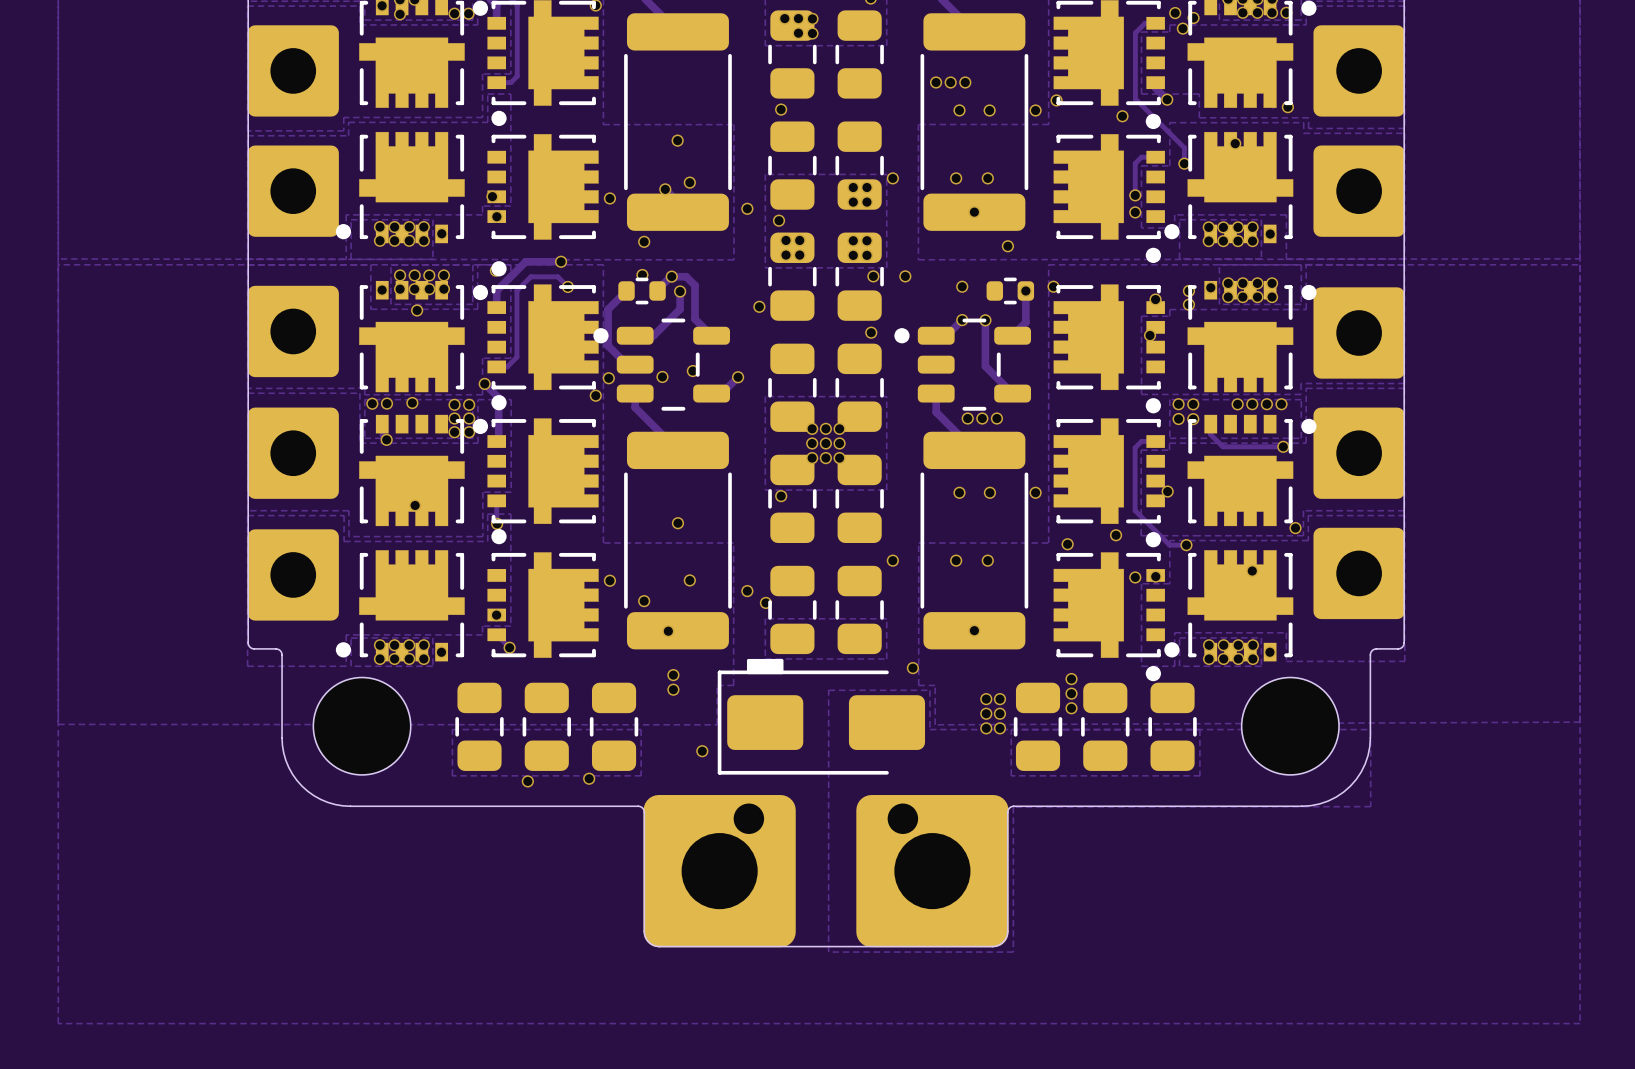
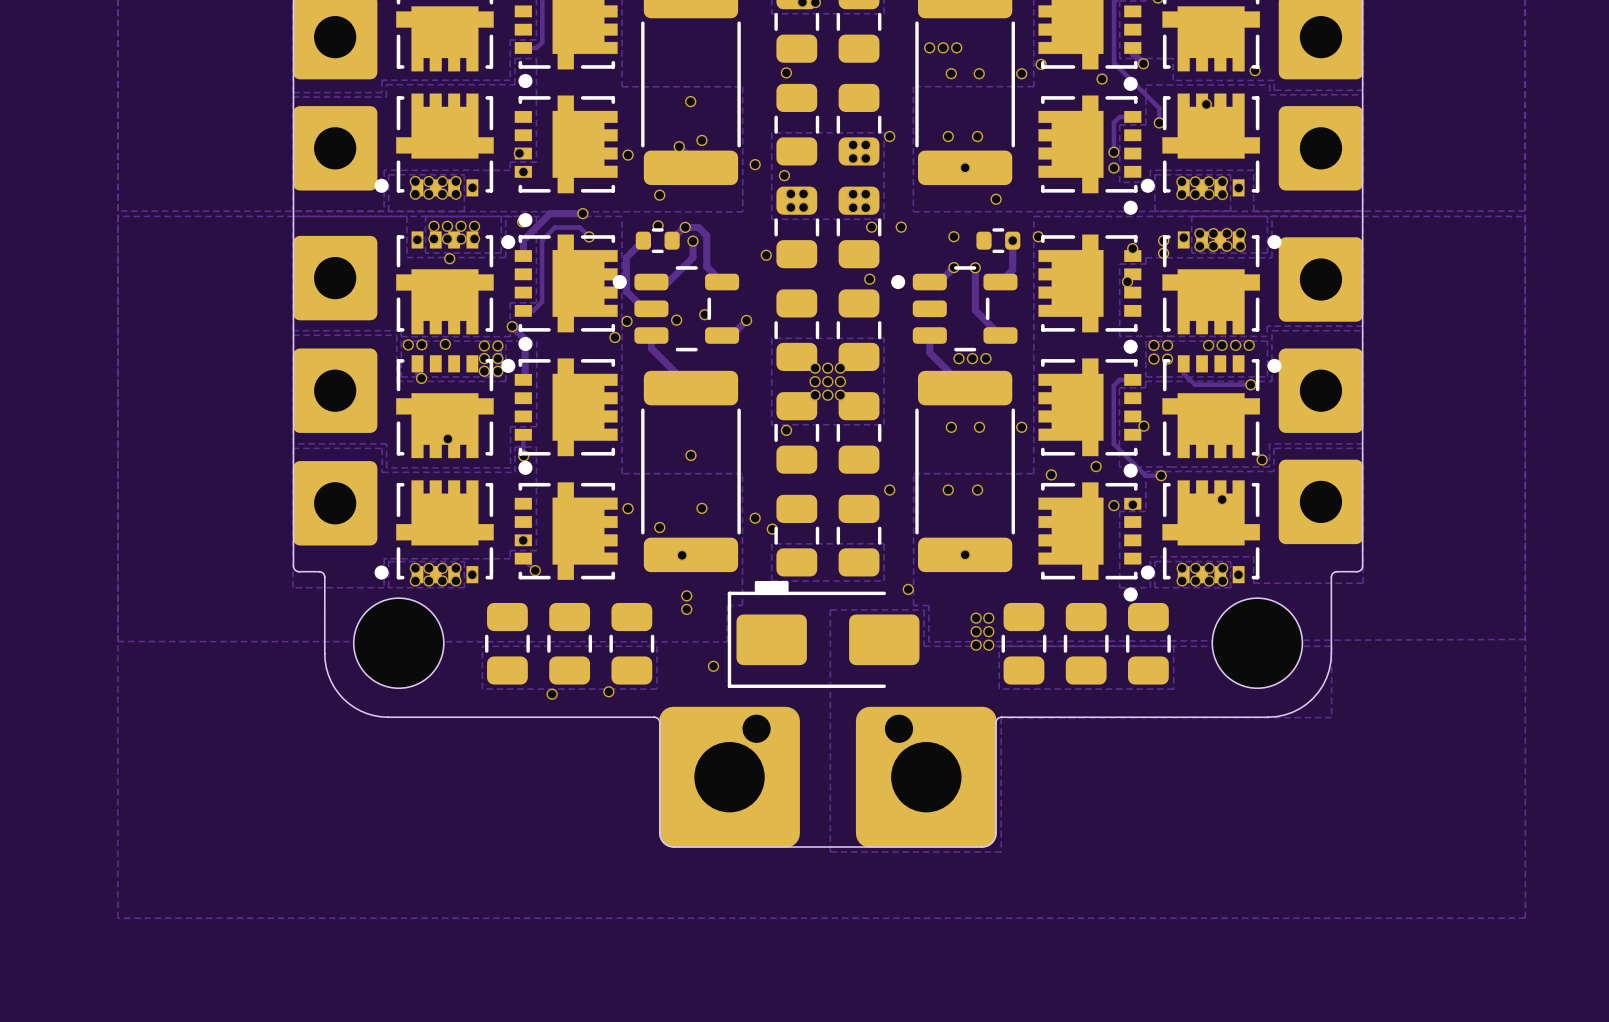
via: (1071, 679) -> none
via: (1071, 693) -> none
via: (1071, 708) -> none

